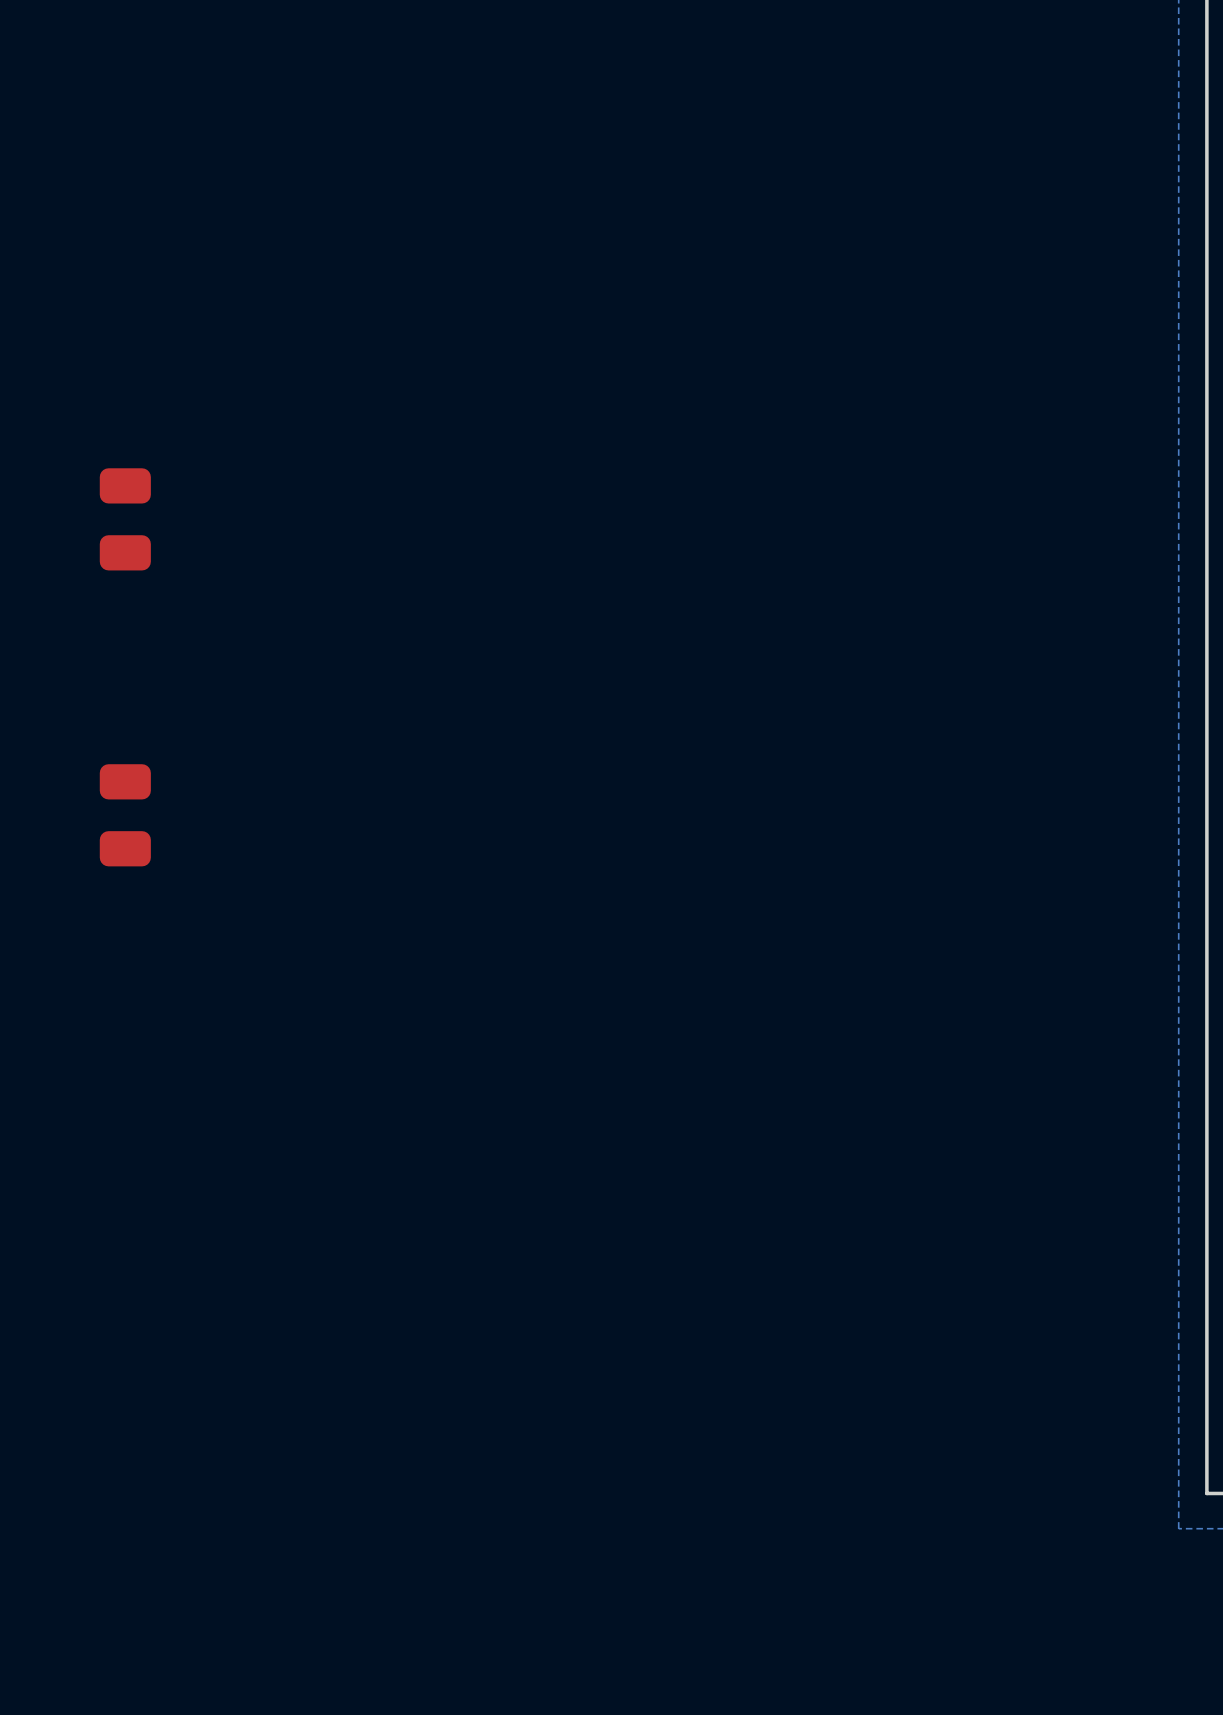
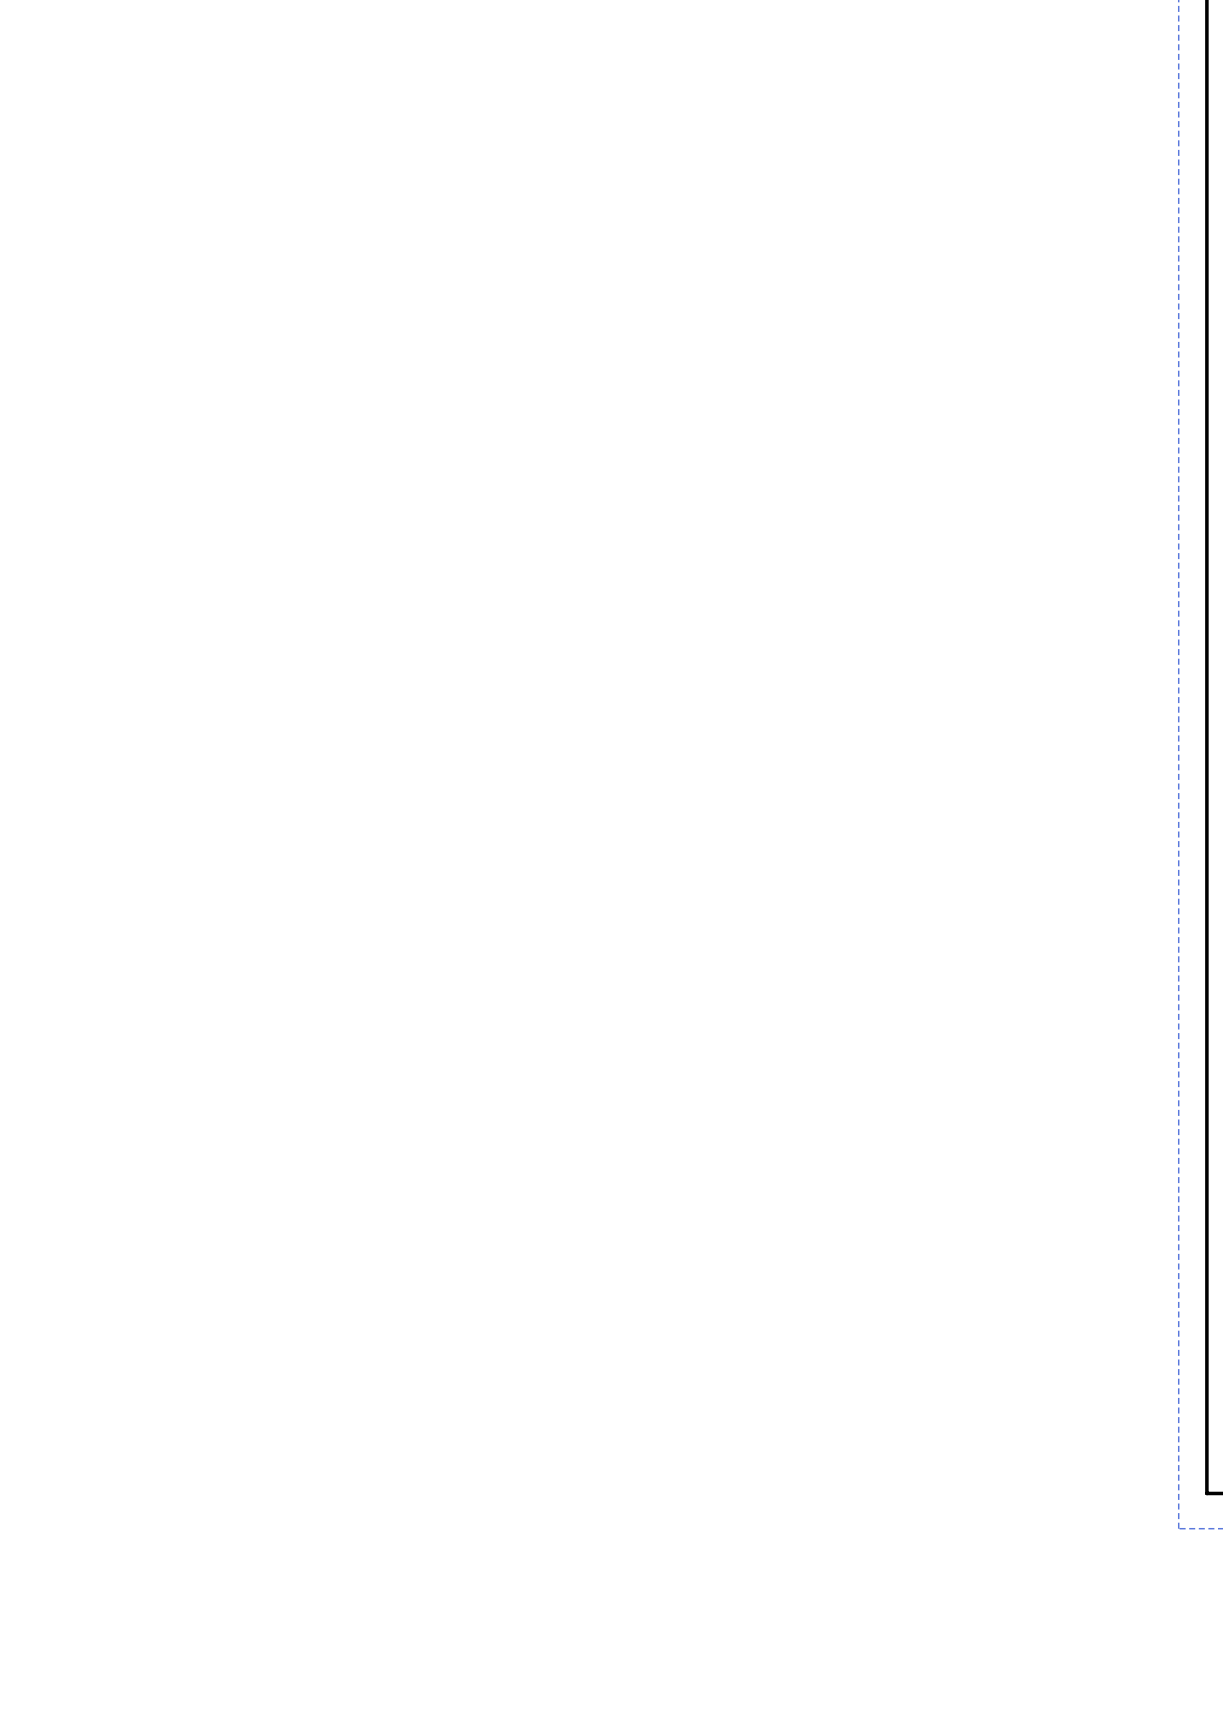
part: (125, 519) -> none
part: (125, 815) -> none

